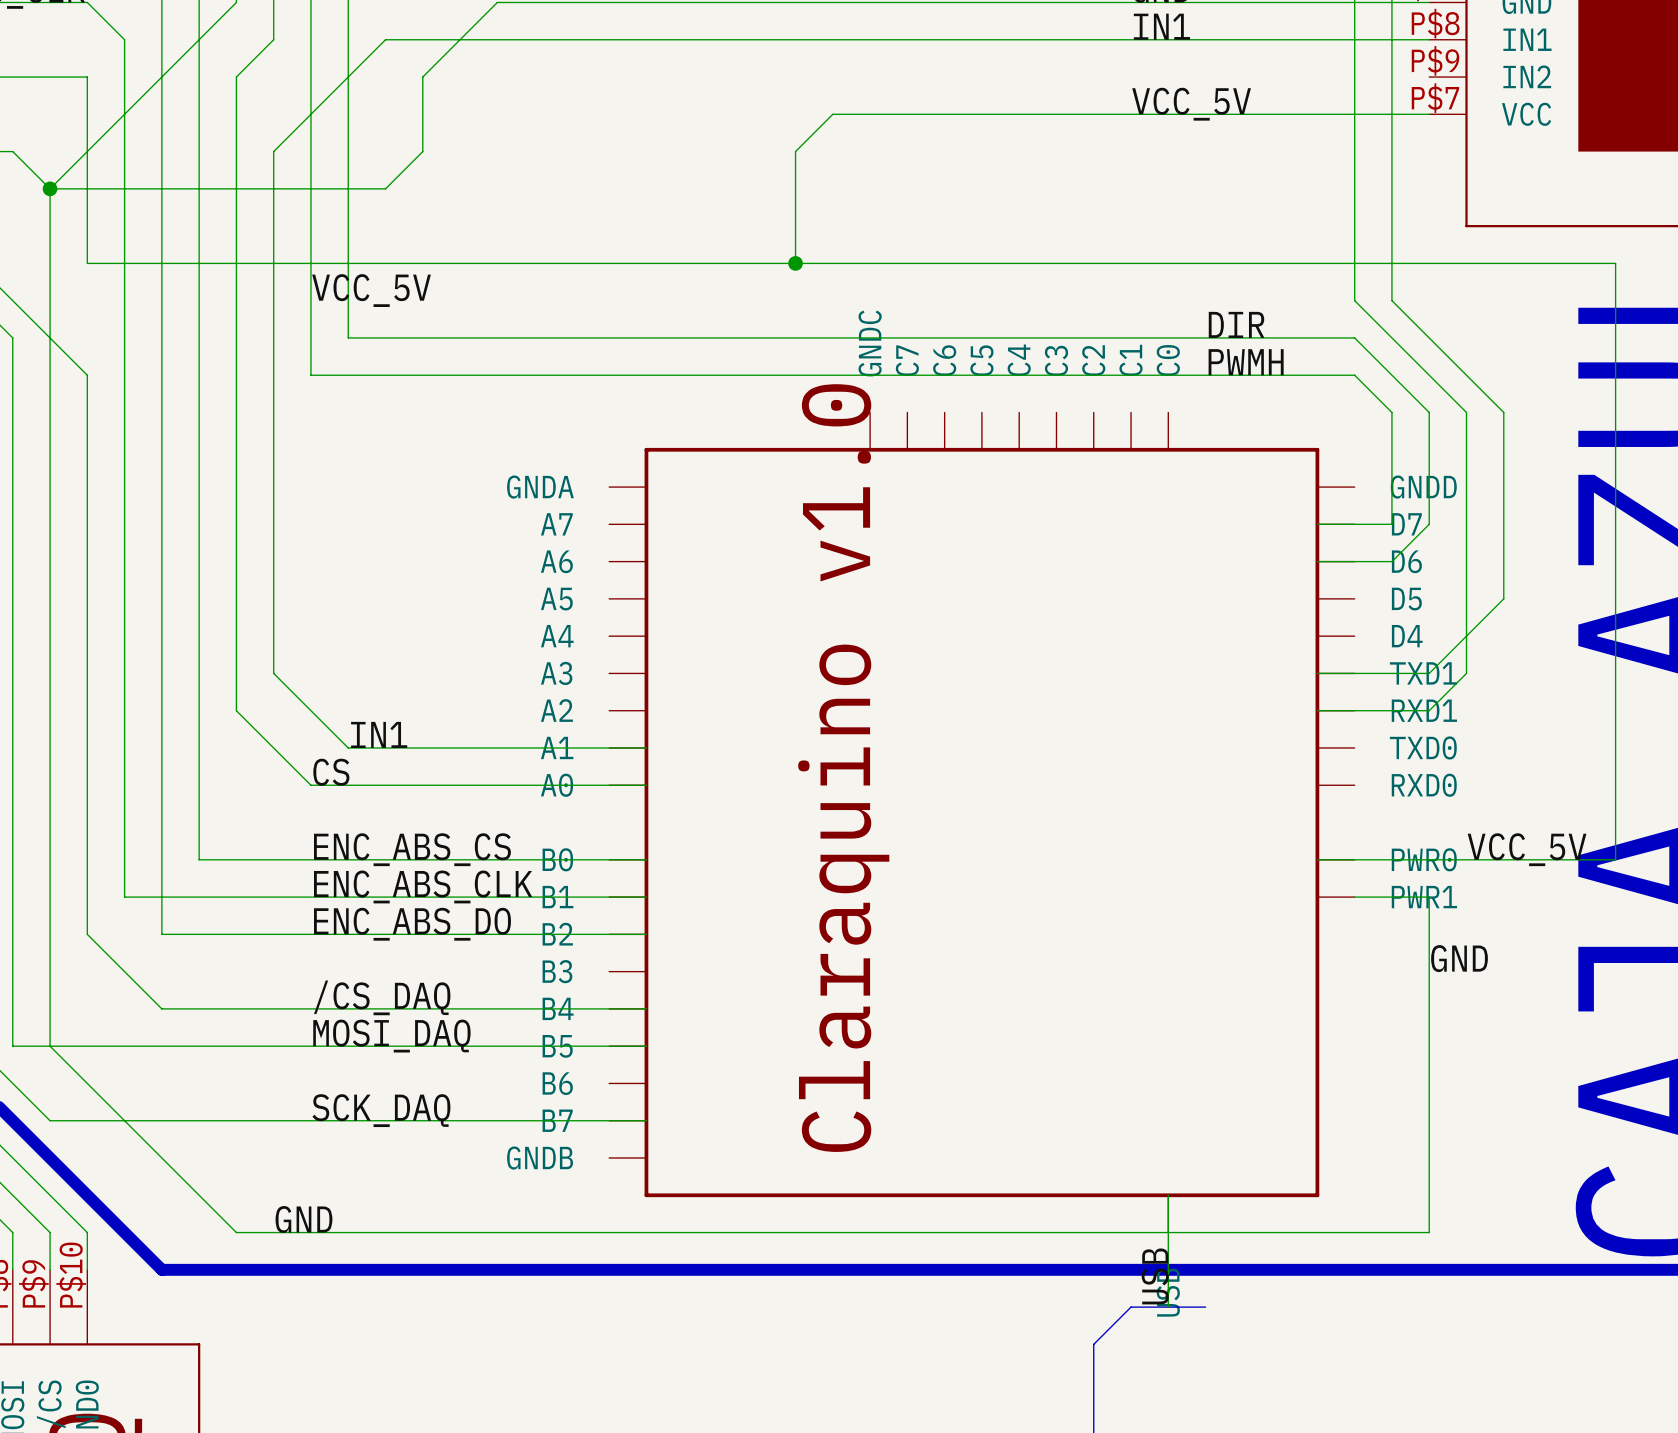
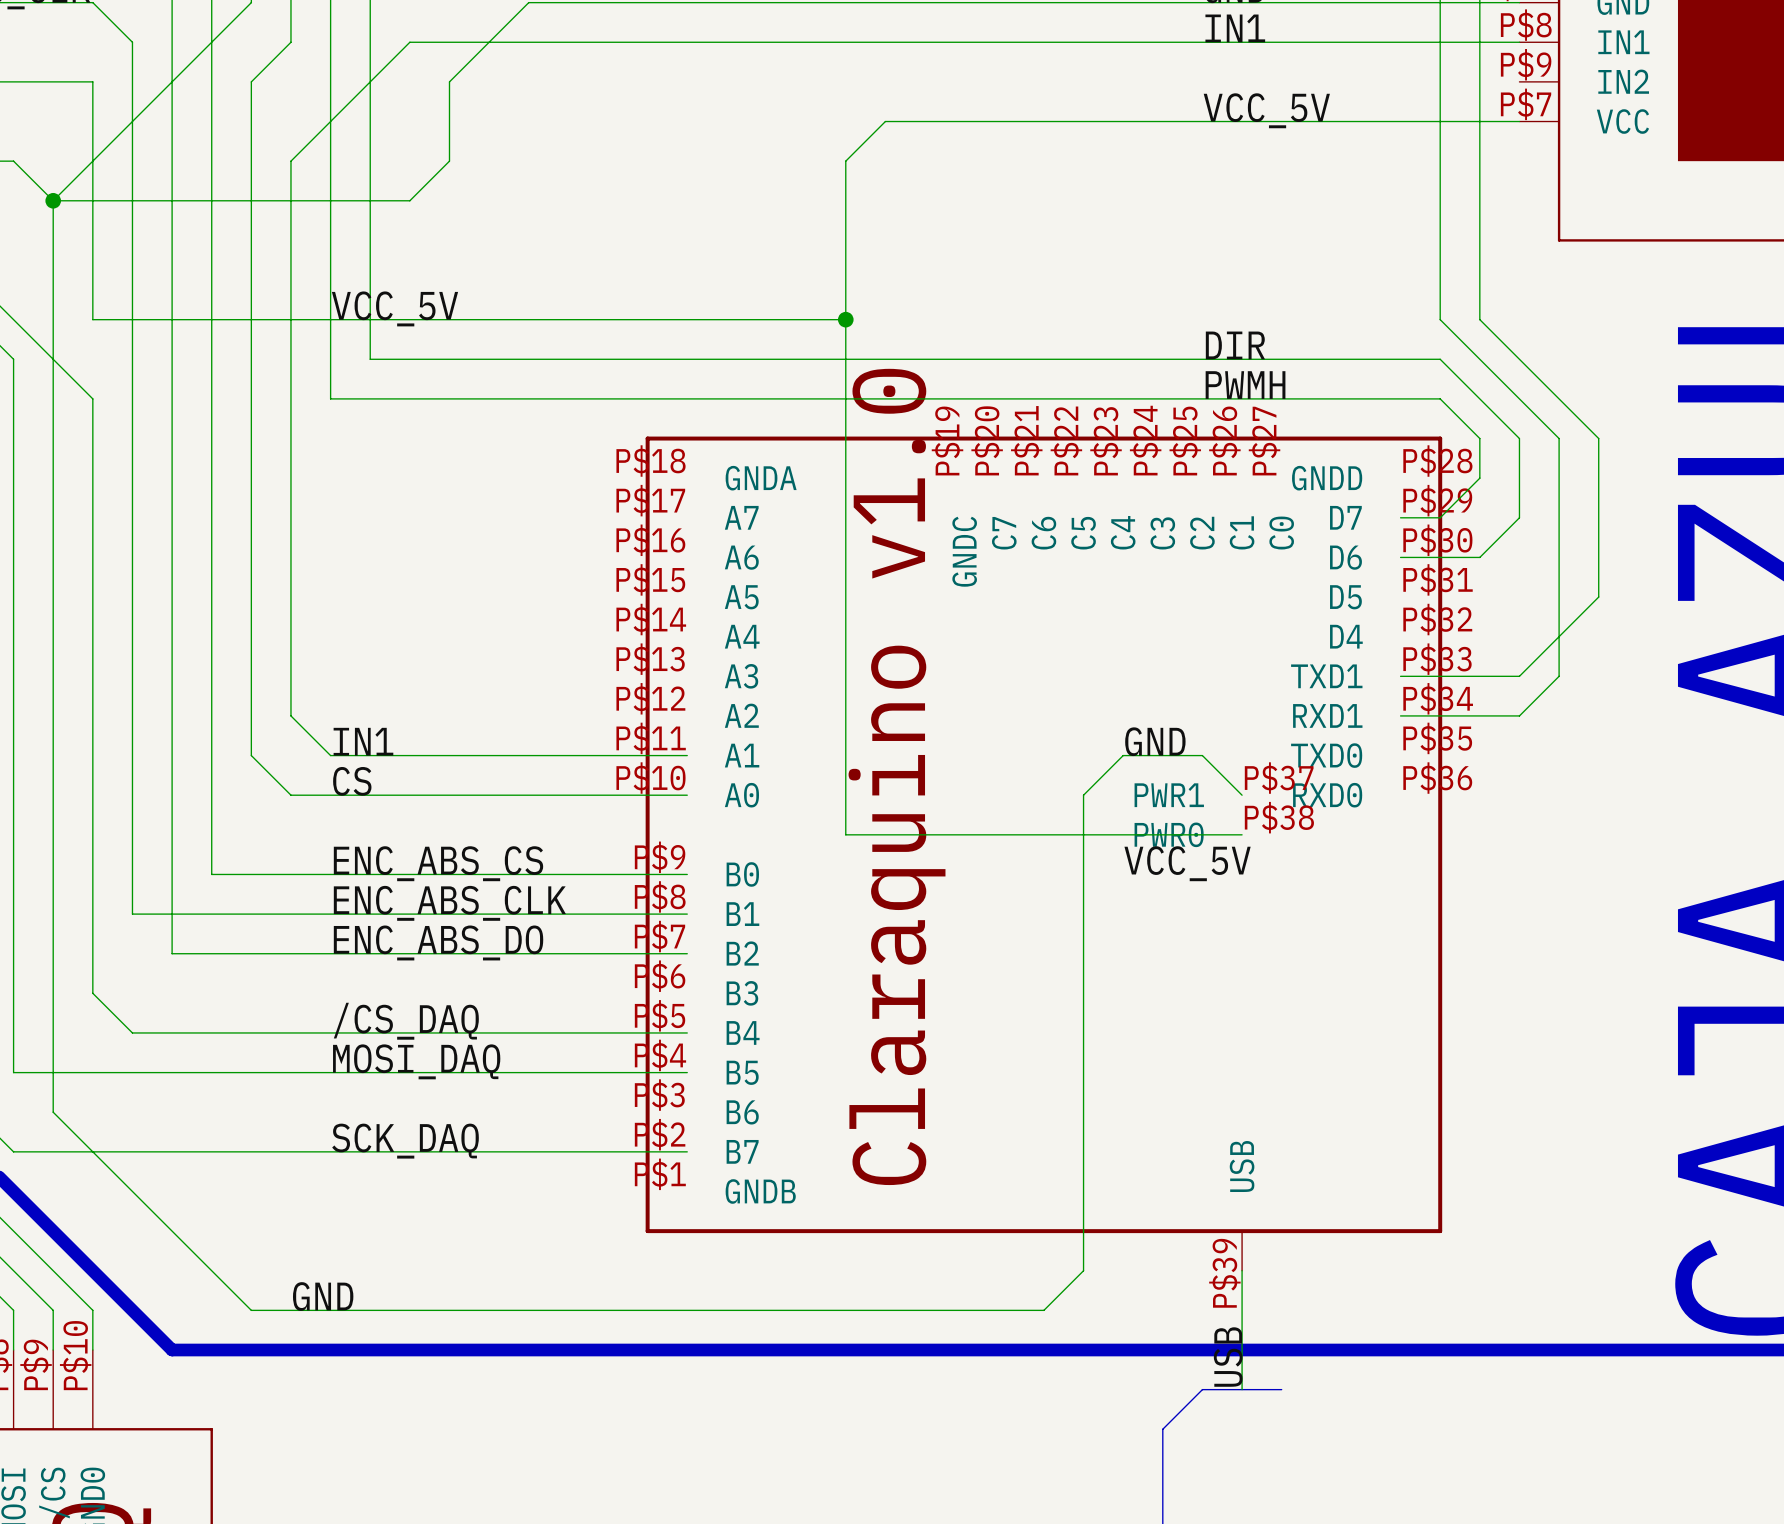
wire: (87, 263) (1615, 263) (1615, 859) (1317, 859) -> (92, 280) (92, 319) (845, 319)
wire: none -> (845, 280) (845, 834) (1242, 834)
junction position: (795, 263) -> (845, 319)
label position: DIR (1236, 324) -> DIR (1235, 345)
label position: PWMH (1246, 362) -> PWMH (1245, 385)
wire: (1391, 449) (1391, 524) -> (1519, 517) (1479, 557)
wire: none -> (1479, 478) (1440, 517) (1400, 517)
wire: (1429, 487) (1429, 524) (1391, 561) (1317, 561) -> none
wire: (1503, 561) (1503, 598) (1466, 636) (1466, 673) (1429, 710) (1317, 710) -> (1598, 597) (1519, 676) (1400, 676)
label: none -> GND (1155, 741)
wire: (310, 710) (348, 747) -> (290, 795) (370, 795)
wire: none -> (330, 755) (687, 755)
label position: IN1 (379, 734) -> IN1 (363, 741)
wire: (273, 747) (310, 785) (646, 785) -> none
label position: CS (331, 772) -> CS (352, 781)
part: none -> (1043, 853)
label: none -> ENC_ABS_CS (438, 863)
label: none -> VCC_5V (1187, 863)
wire: (199, 822) (199, 859) -> (132, 914) (211, 914)
wire: none -> (211, 874) (687, 874)
part: (981, 822) -> none
label: ENC_ABS_CS (412, 849) -> ENC_ABS_CLK (449, 903)
label: VCC_5V (1527, 849) -> none
wire: (124, 859) (124, 897) (161, 897) (161, 934) (646, 934) -> none
label: ENC_ABS_CLK (423, 886) -> ENC_ABS_DO (438, 942)
wire: (1354, 897) (1429, 897) (1429, 1232) (981, 1232) -> (1242, 795) (1202, 755) (1123, 755) (1083, 795) (1083, 1270) (1043, 1310)
label: ENC_ABS_DO (412, 924) -> none
label: GND (1459, 958) -> none
label: none -> /CS_DAQ (406, 1021)
wire: (124, 971) (161, 1008) -> (13, 1072) (172, 1072)
wire: none -> (132, 1032) (687, 1032)
label: /CS_DAQ (382, 997) -> MOSI_DAQ (416, 1061)
wire: (12, 1008) (12, 1046) (646, 1046) -> none
label: MOSI_DAQ (391, 1036) -> none
wire: (12, 1083) (50, 1120) (646, 1120) -> (13, 1151) (687, 1151)
label position: SCK_DAQ (381, 1110) -> SCK_DAQ (405, 1141)

